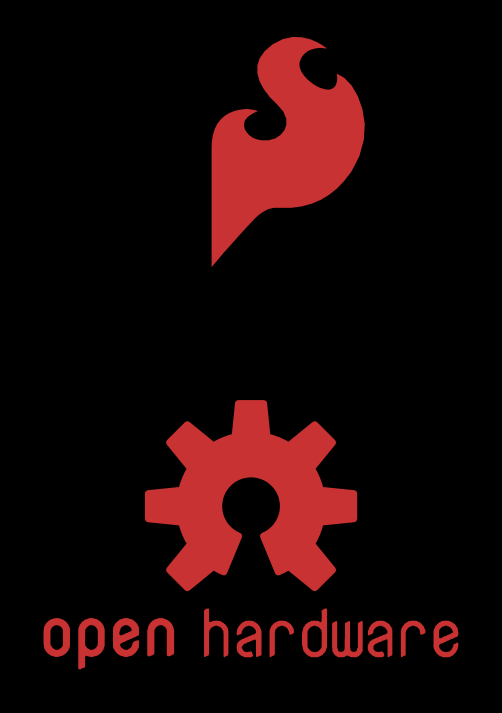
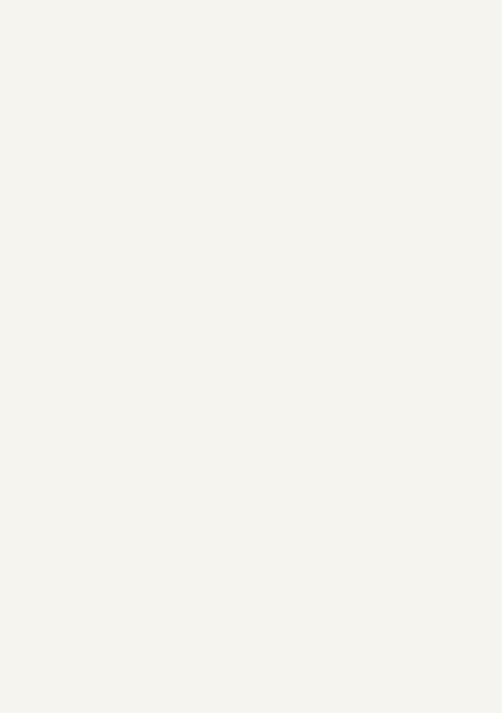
part: (288, 151) -> none
part: (250, 534) -> none

